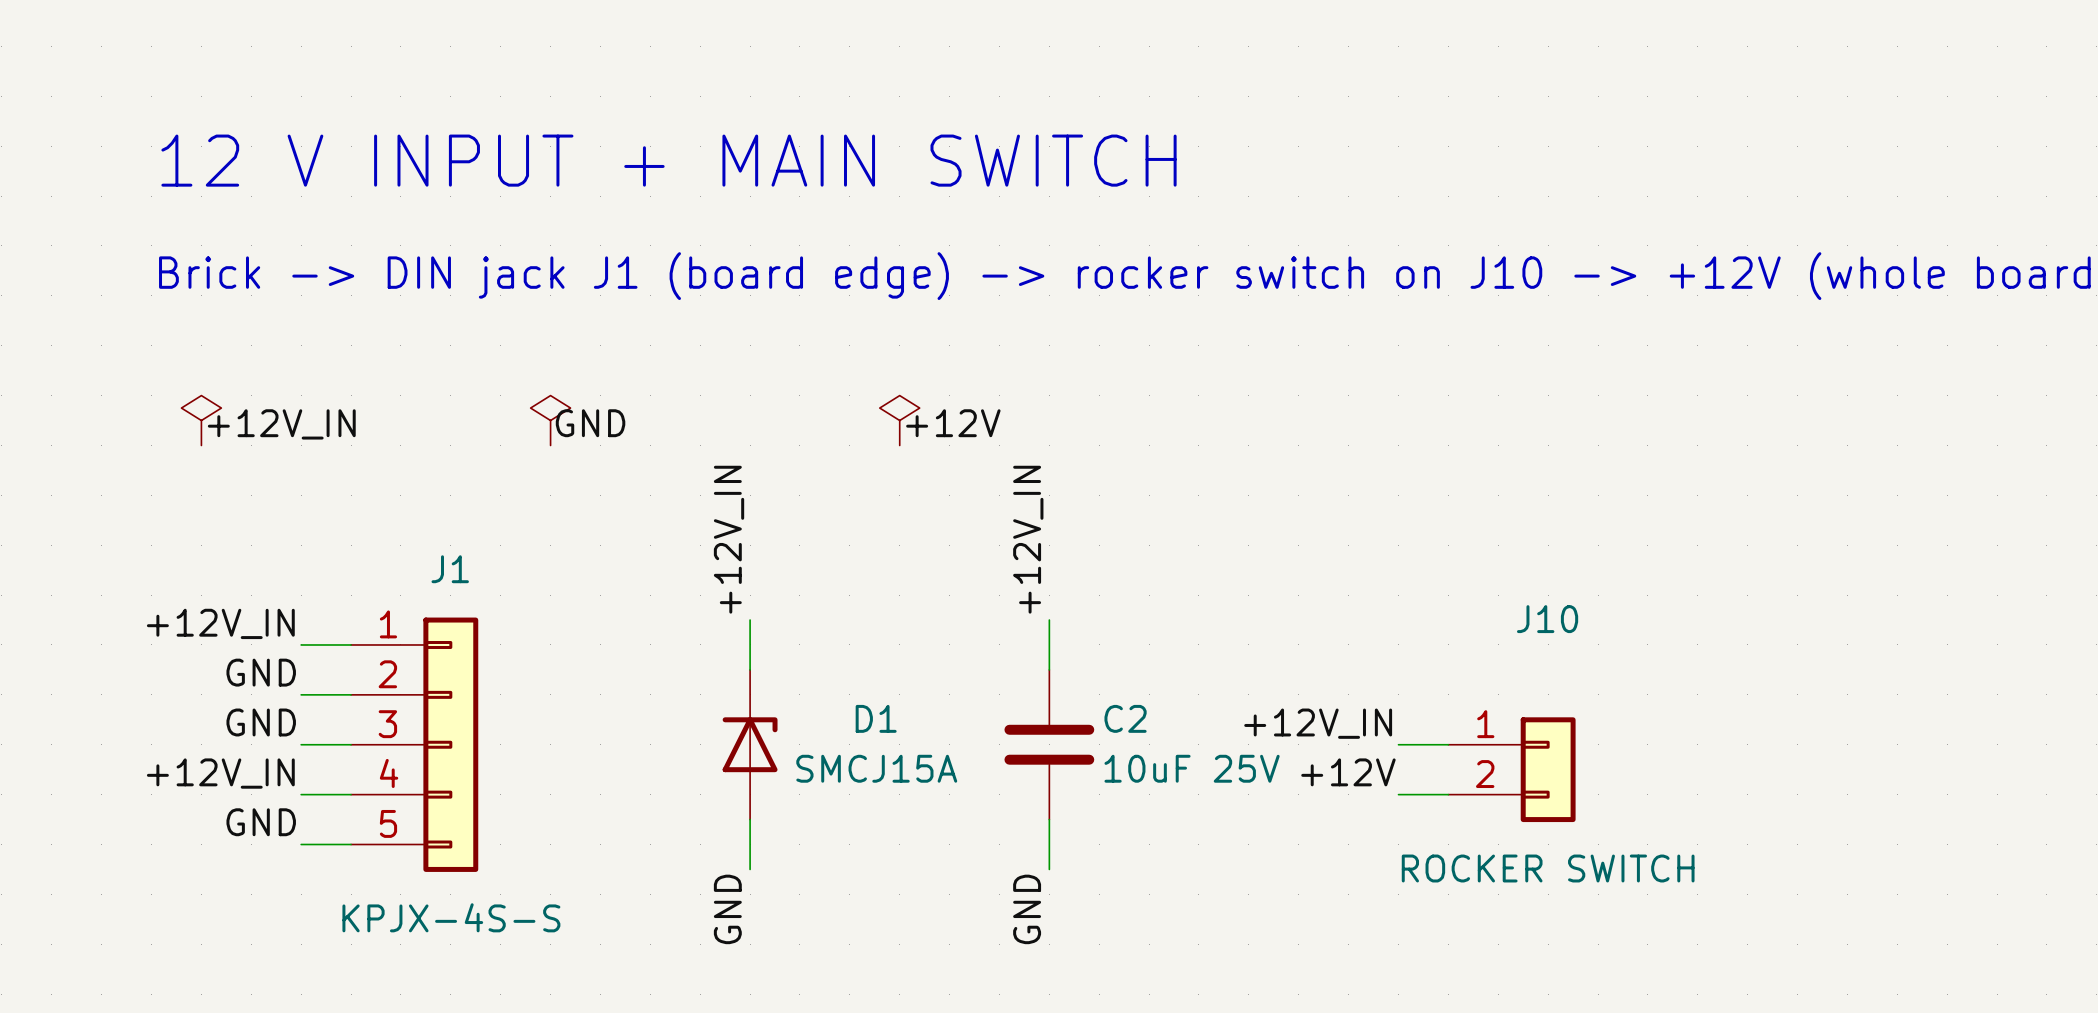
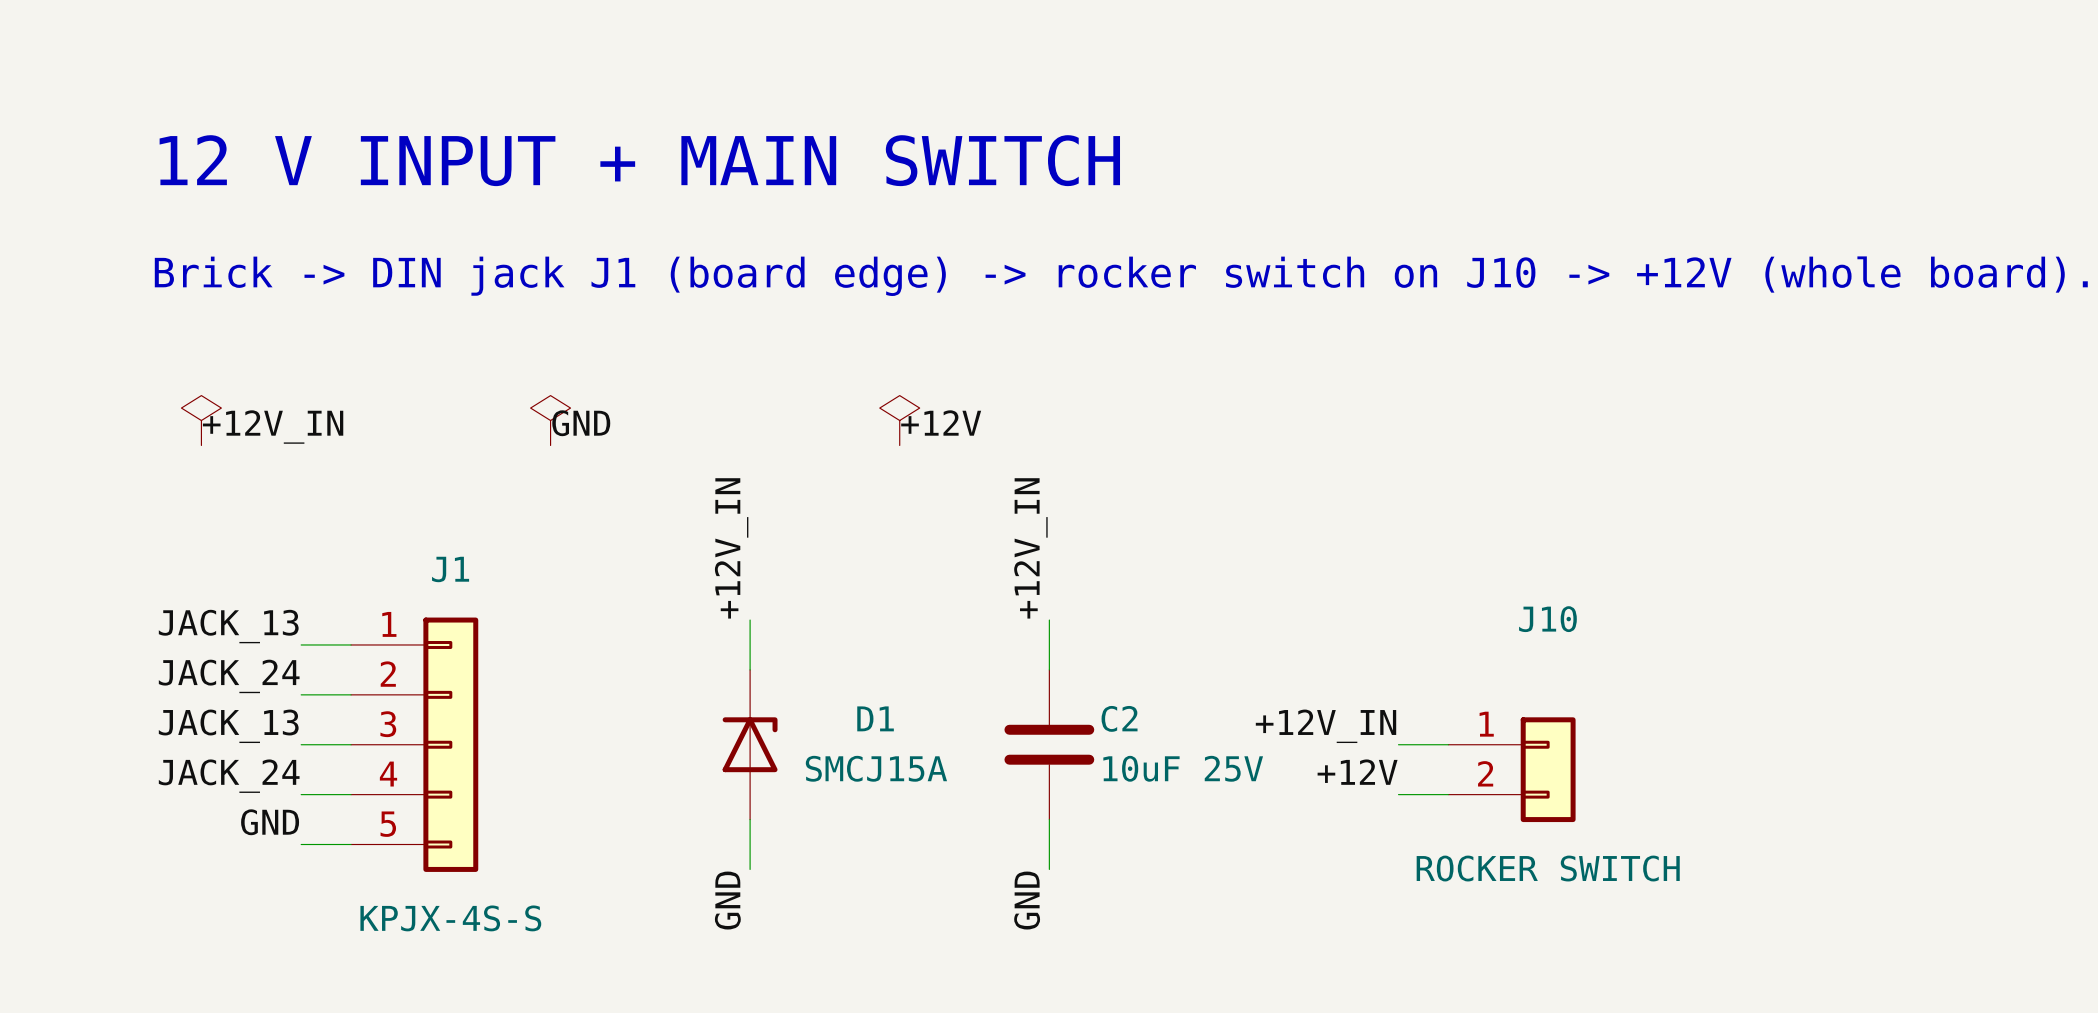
label: +12V_IN (220, 623) -> JACK_13 (228, 626)
label: GND (261, 672) -> JACK_24 (229, 676)
label: GND (261, 722) -> JACK_13 (228, 726)
label: +12V_IN (220, 773) -> JACK_24 (229, 776)

